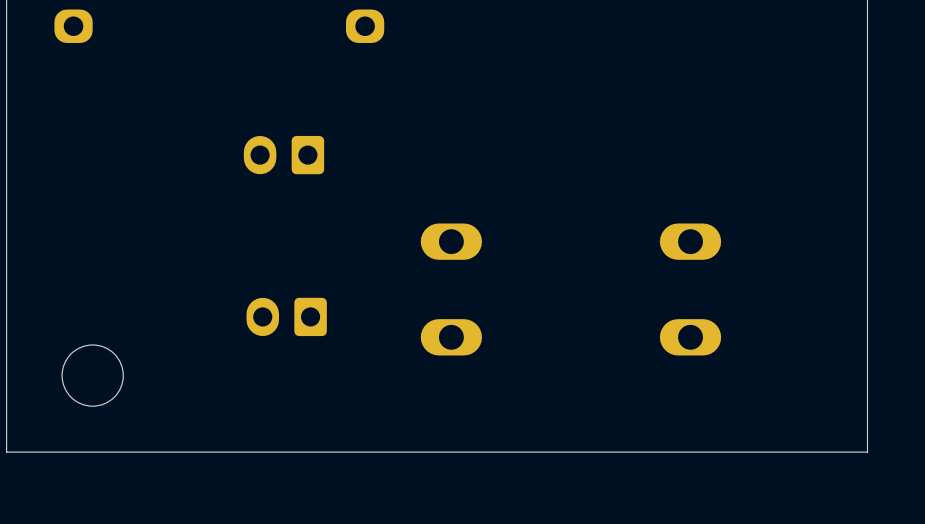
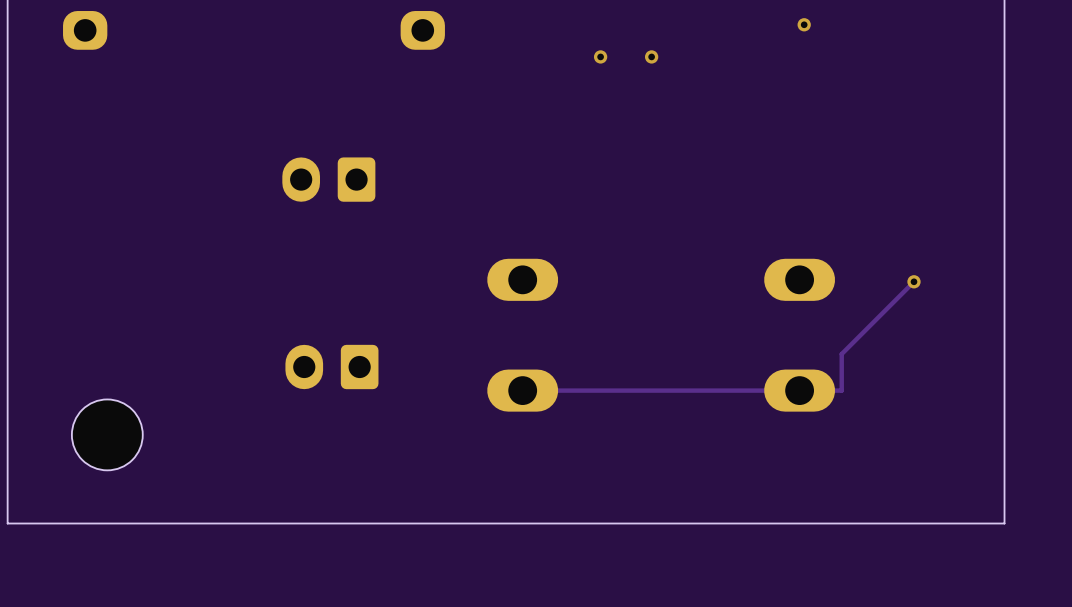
via: none -> (804, 24)
via: none -> (600, 56)
via: none -> (651, 56)
track: none -> (913, 281) (841, 354) (841, 390) (522, 390)
via: none -> (913, 281)

